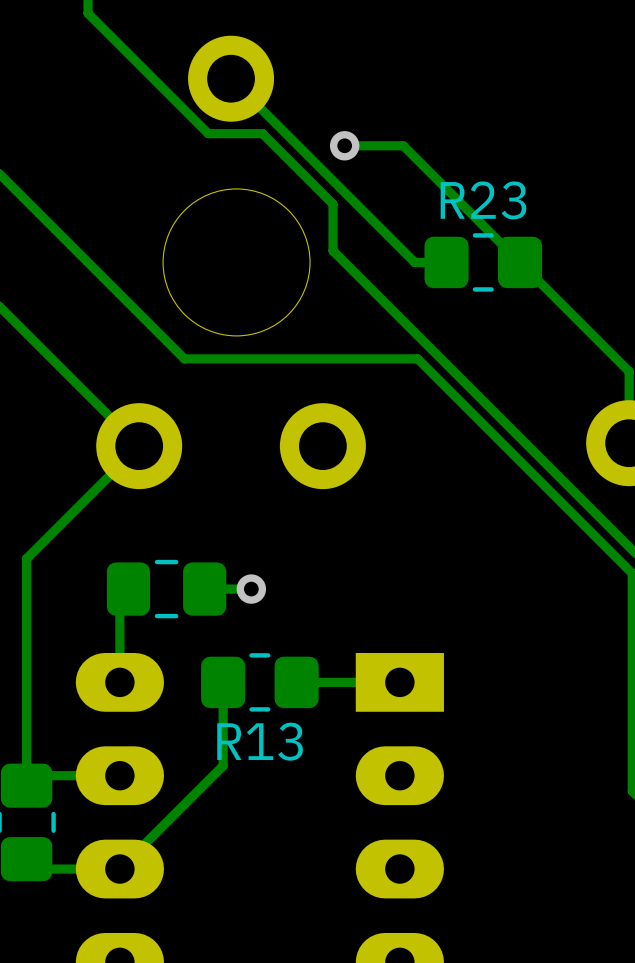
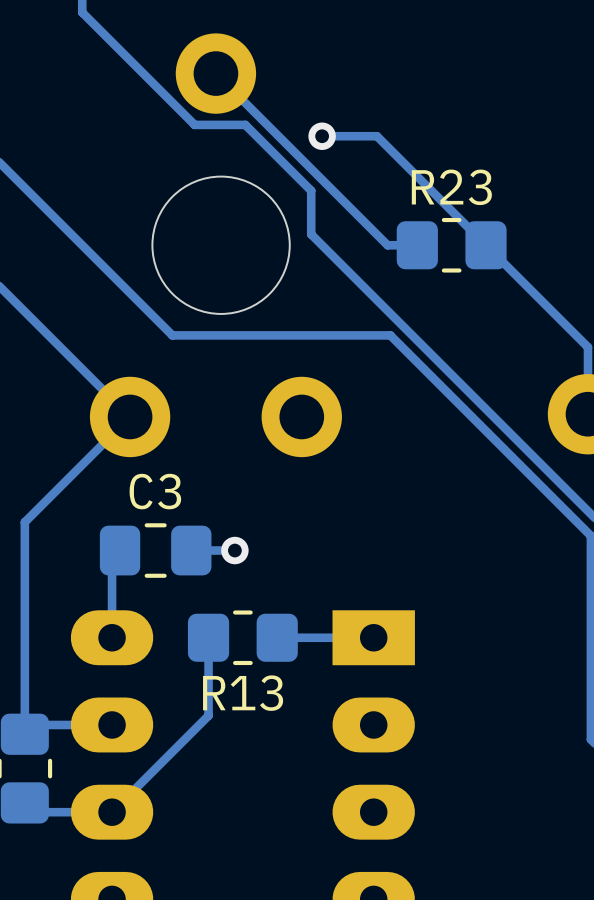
C3 name: none -> C3 (155, 491)

